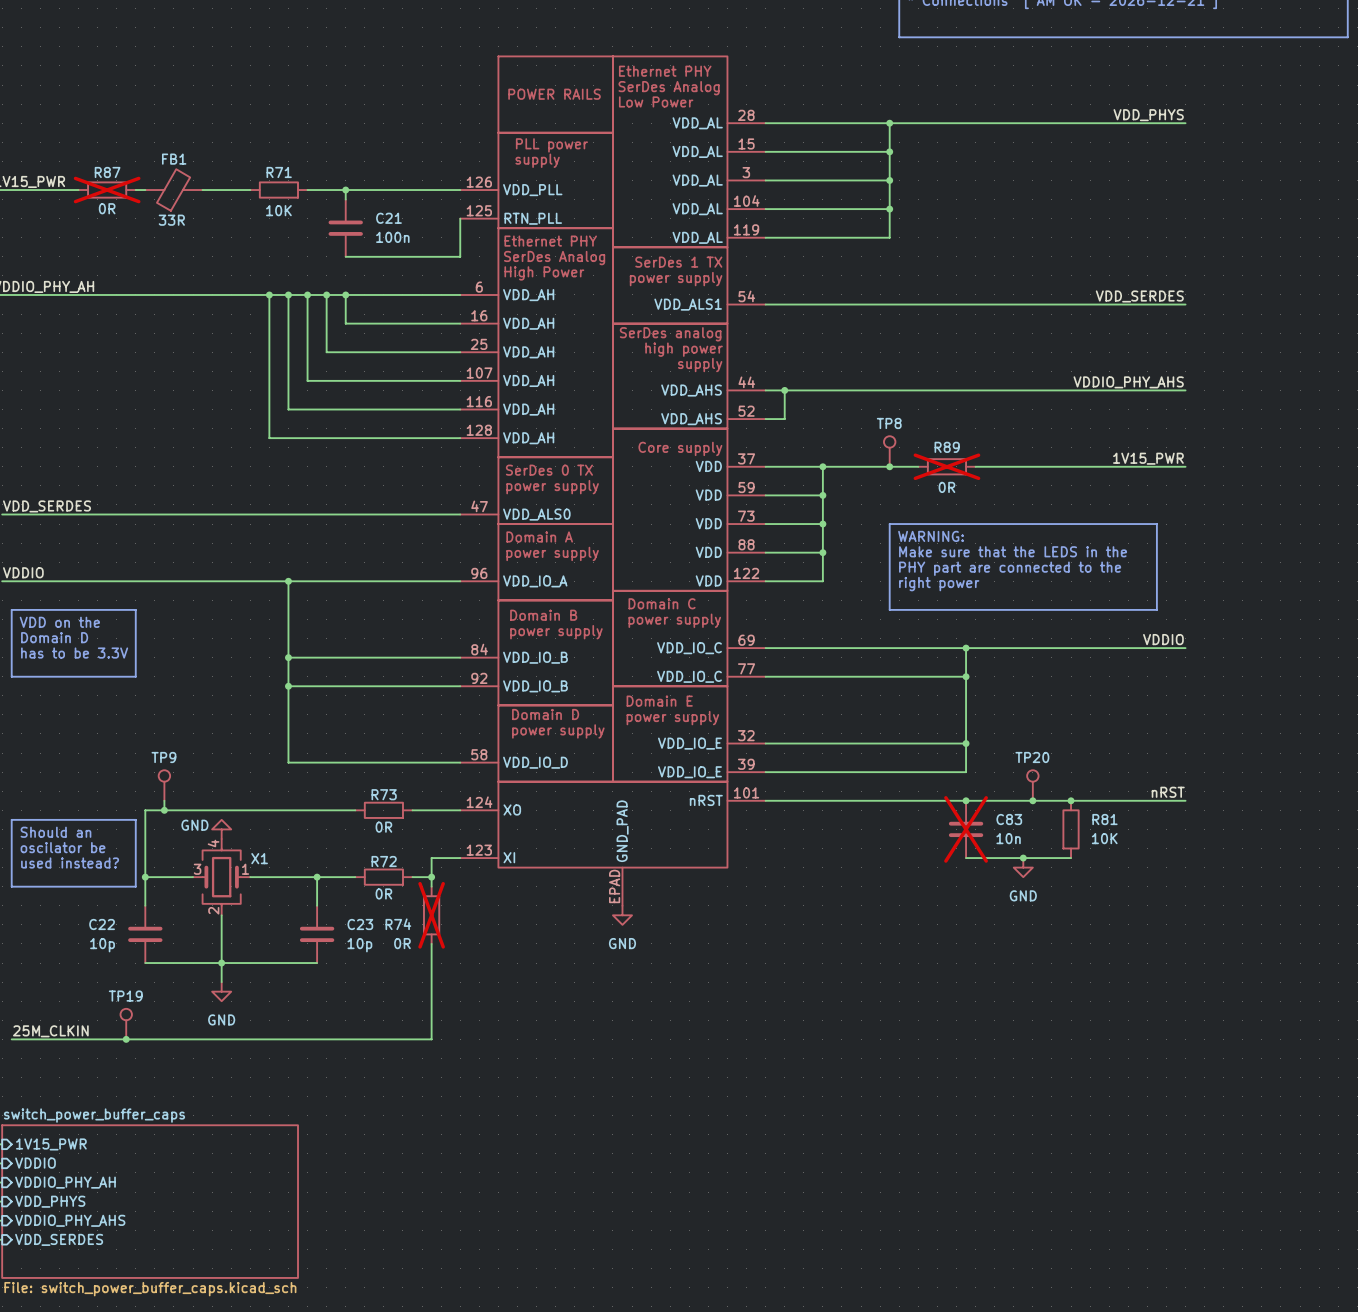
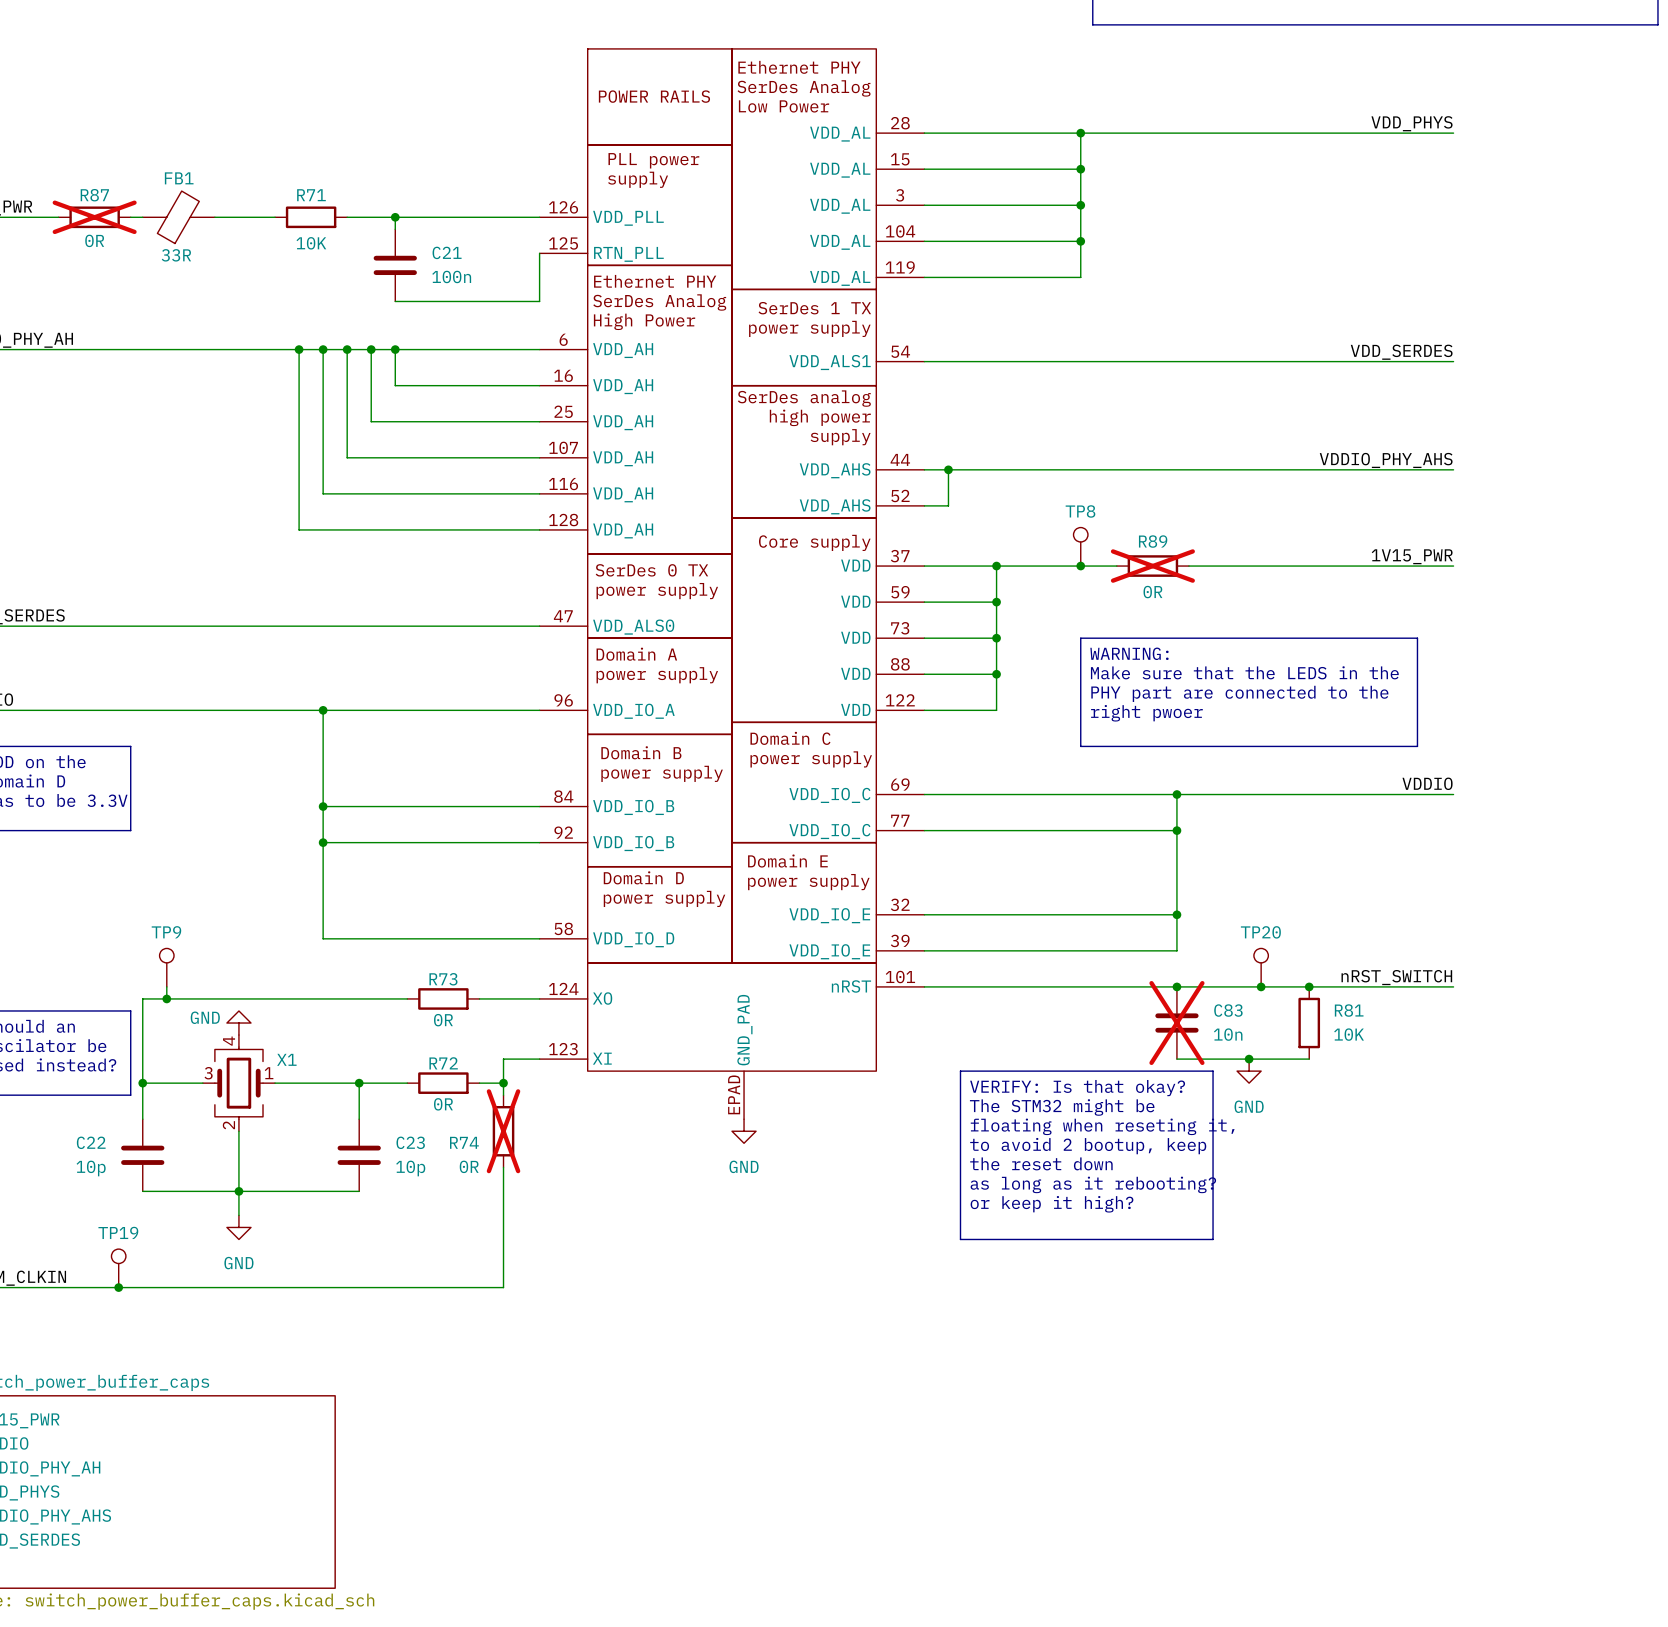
text: right power (939, 584) -> right pwoer (1146, 713)
label: nRST (1168, 792) -> nRST_SWITCH (1396, 977)
line: none -> (960, 1071) (1213, 1071) (1213, 1239) (960, 1239) (960, 1071)
text: none -> VERIFY: Is that okay? (1077, 1088)
text: none -> The STM32 might be (1062, 1107)
text: none -> floating when reseting it, (1102, 1126)
text: none -> to avoid 2 bootup, keep (1088, 1146)
text: none -> the reset down (1041, 1163)
text: none -> as long as it rebooting? (1093, 1184)
text: none -> or keep it high? (1052, 1204)

